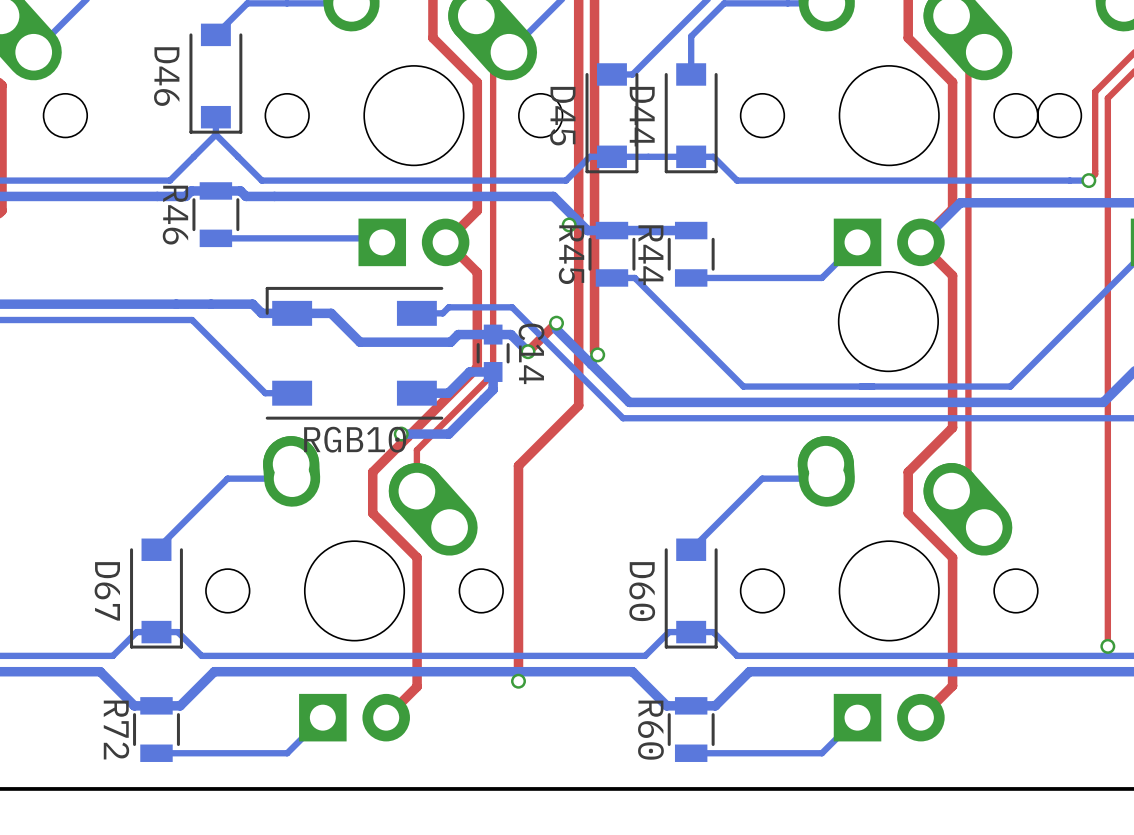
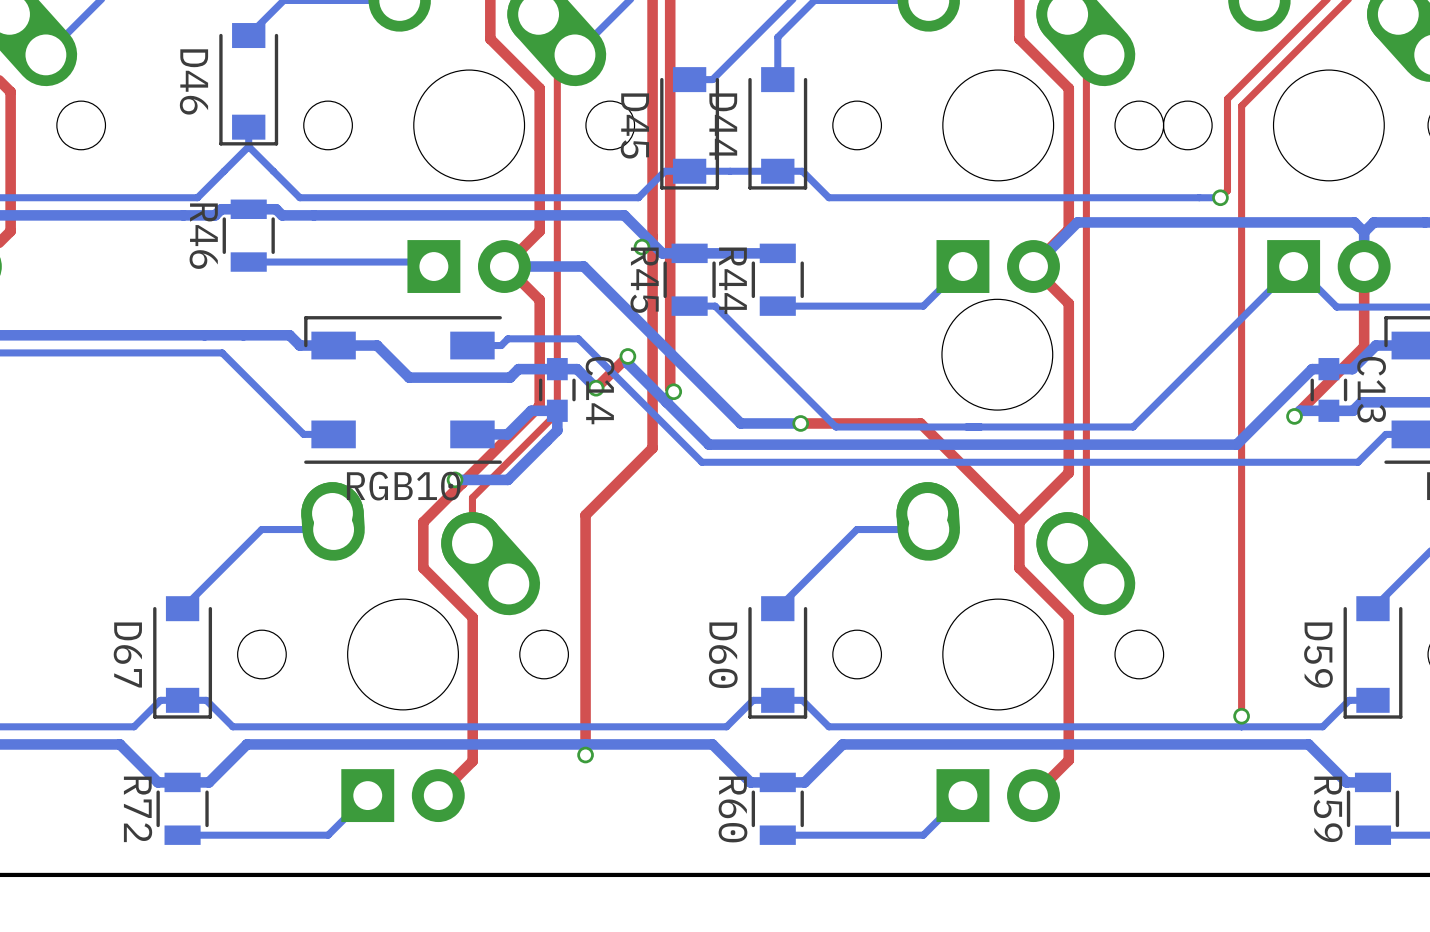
bottom track: none -> (504, 266) (583, 266) (740, 423) (800, 423)
top track: none -> (800, 423) (920, 423) (1019, 522)
via: none -> (800, 423)

